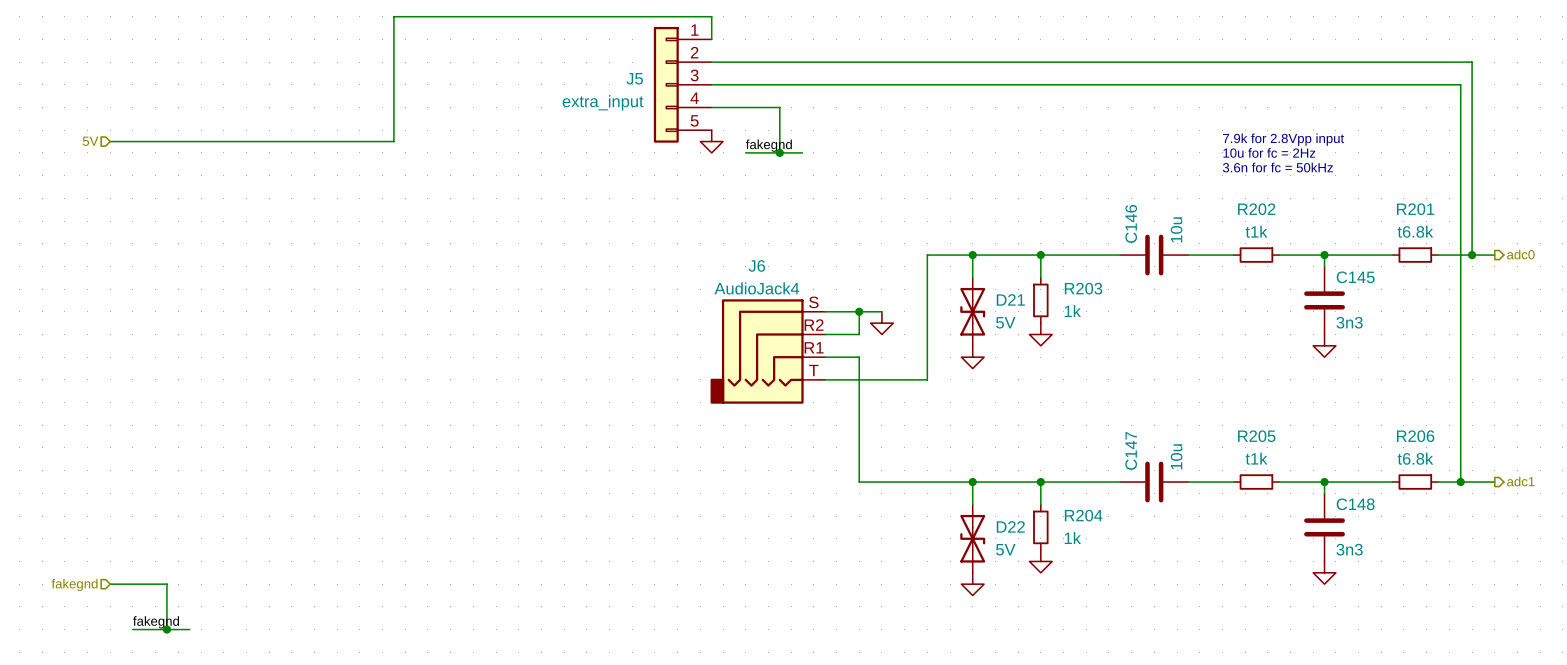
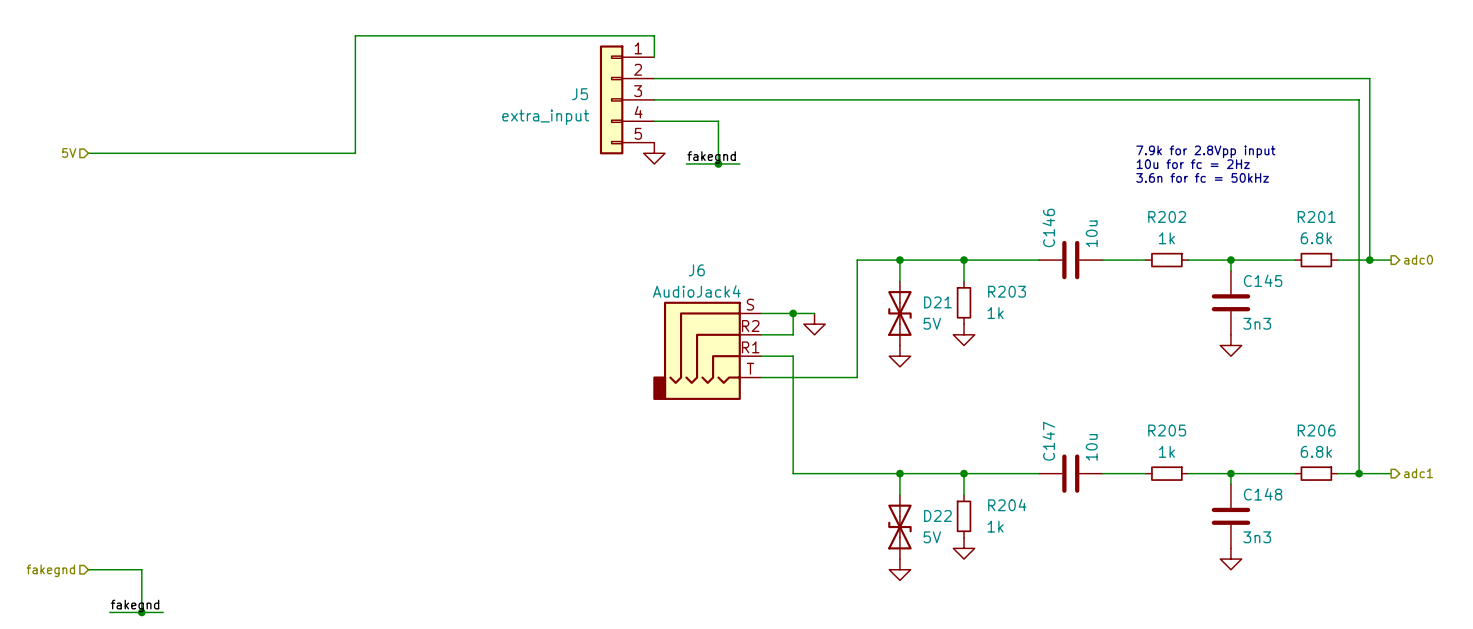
R202 value: t1k (1256, 231) -> 1k (1166, 238)
R201 value: t6.8k (1415, 231) -> 6.8k (1316, 238)
R205 value: t1k (1256, 458) -> 1k (1166, 451)
R206 value: t6.8k (1415, 458) -> 6.8k (1316, 451)

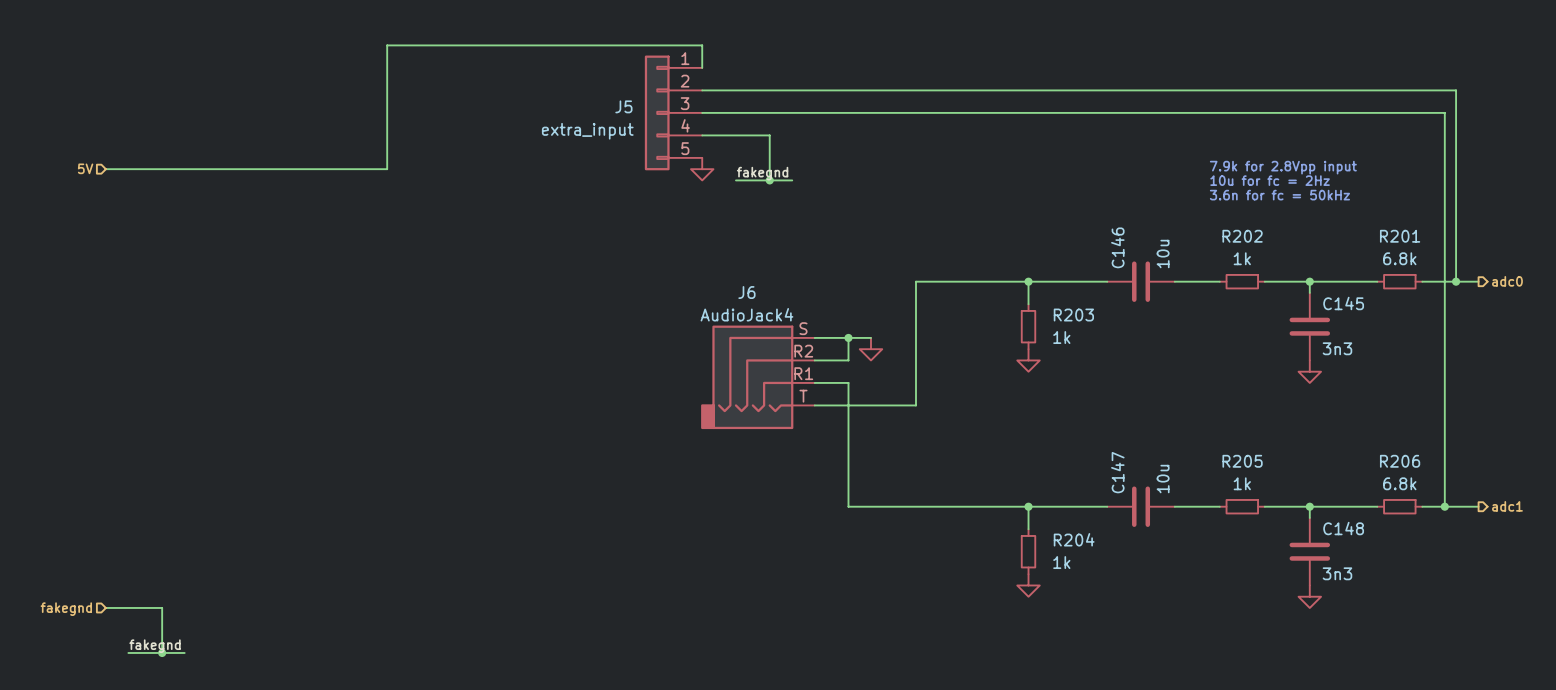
wire: (899, 260) (899, 281) -> none
junction: (899, 260) -> none
D21: 5V (899, 313) -> none
power symbol: (899, 356) -> none
wire: (899, 473) (899, 494) -> none
junction: (899, 473) -> none
D22: 5V (899, 527) -> none
power symbol: (899, 569) -> none

